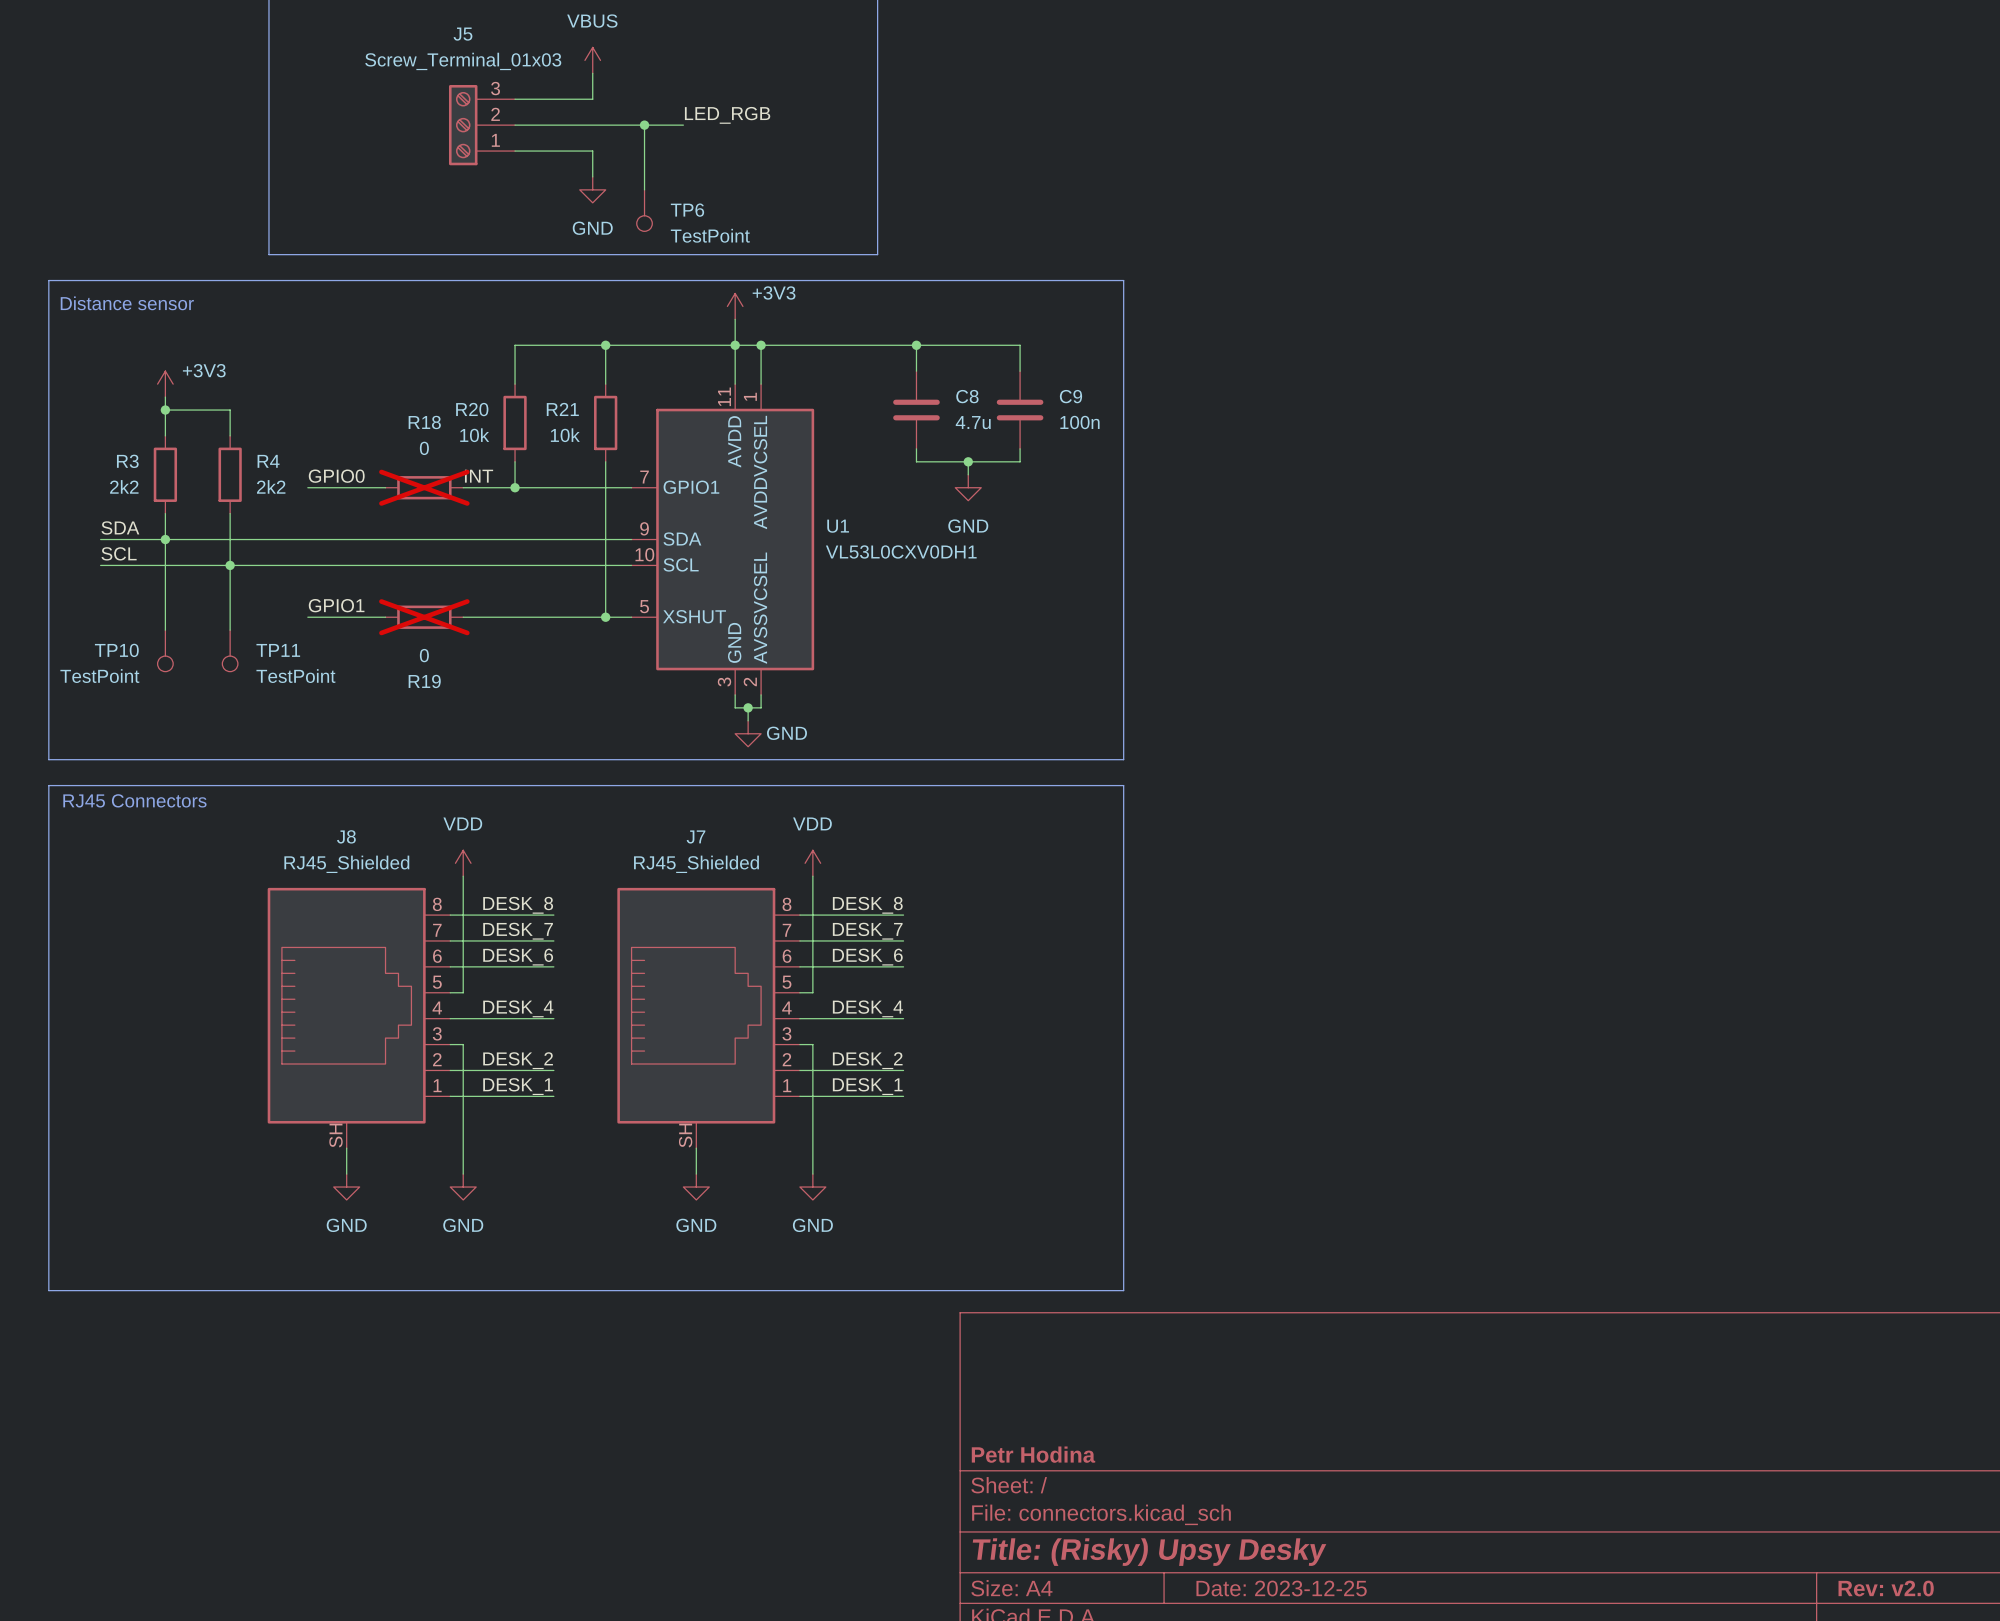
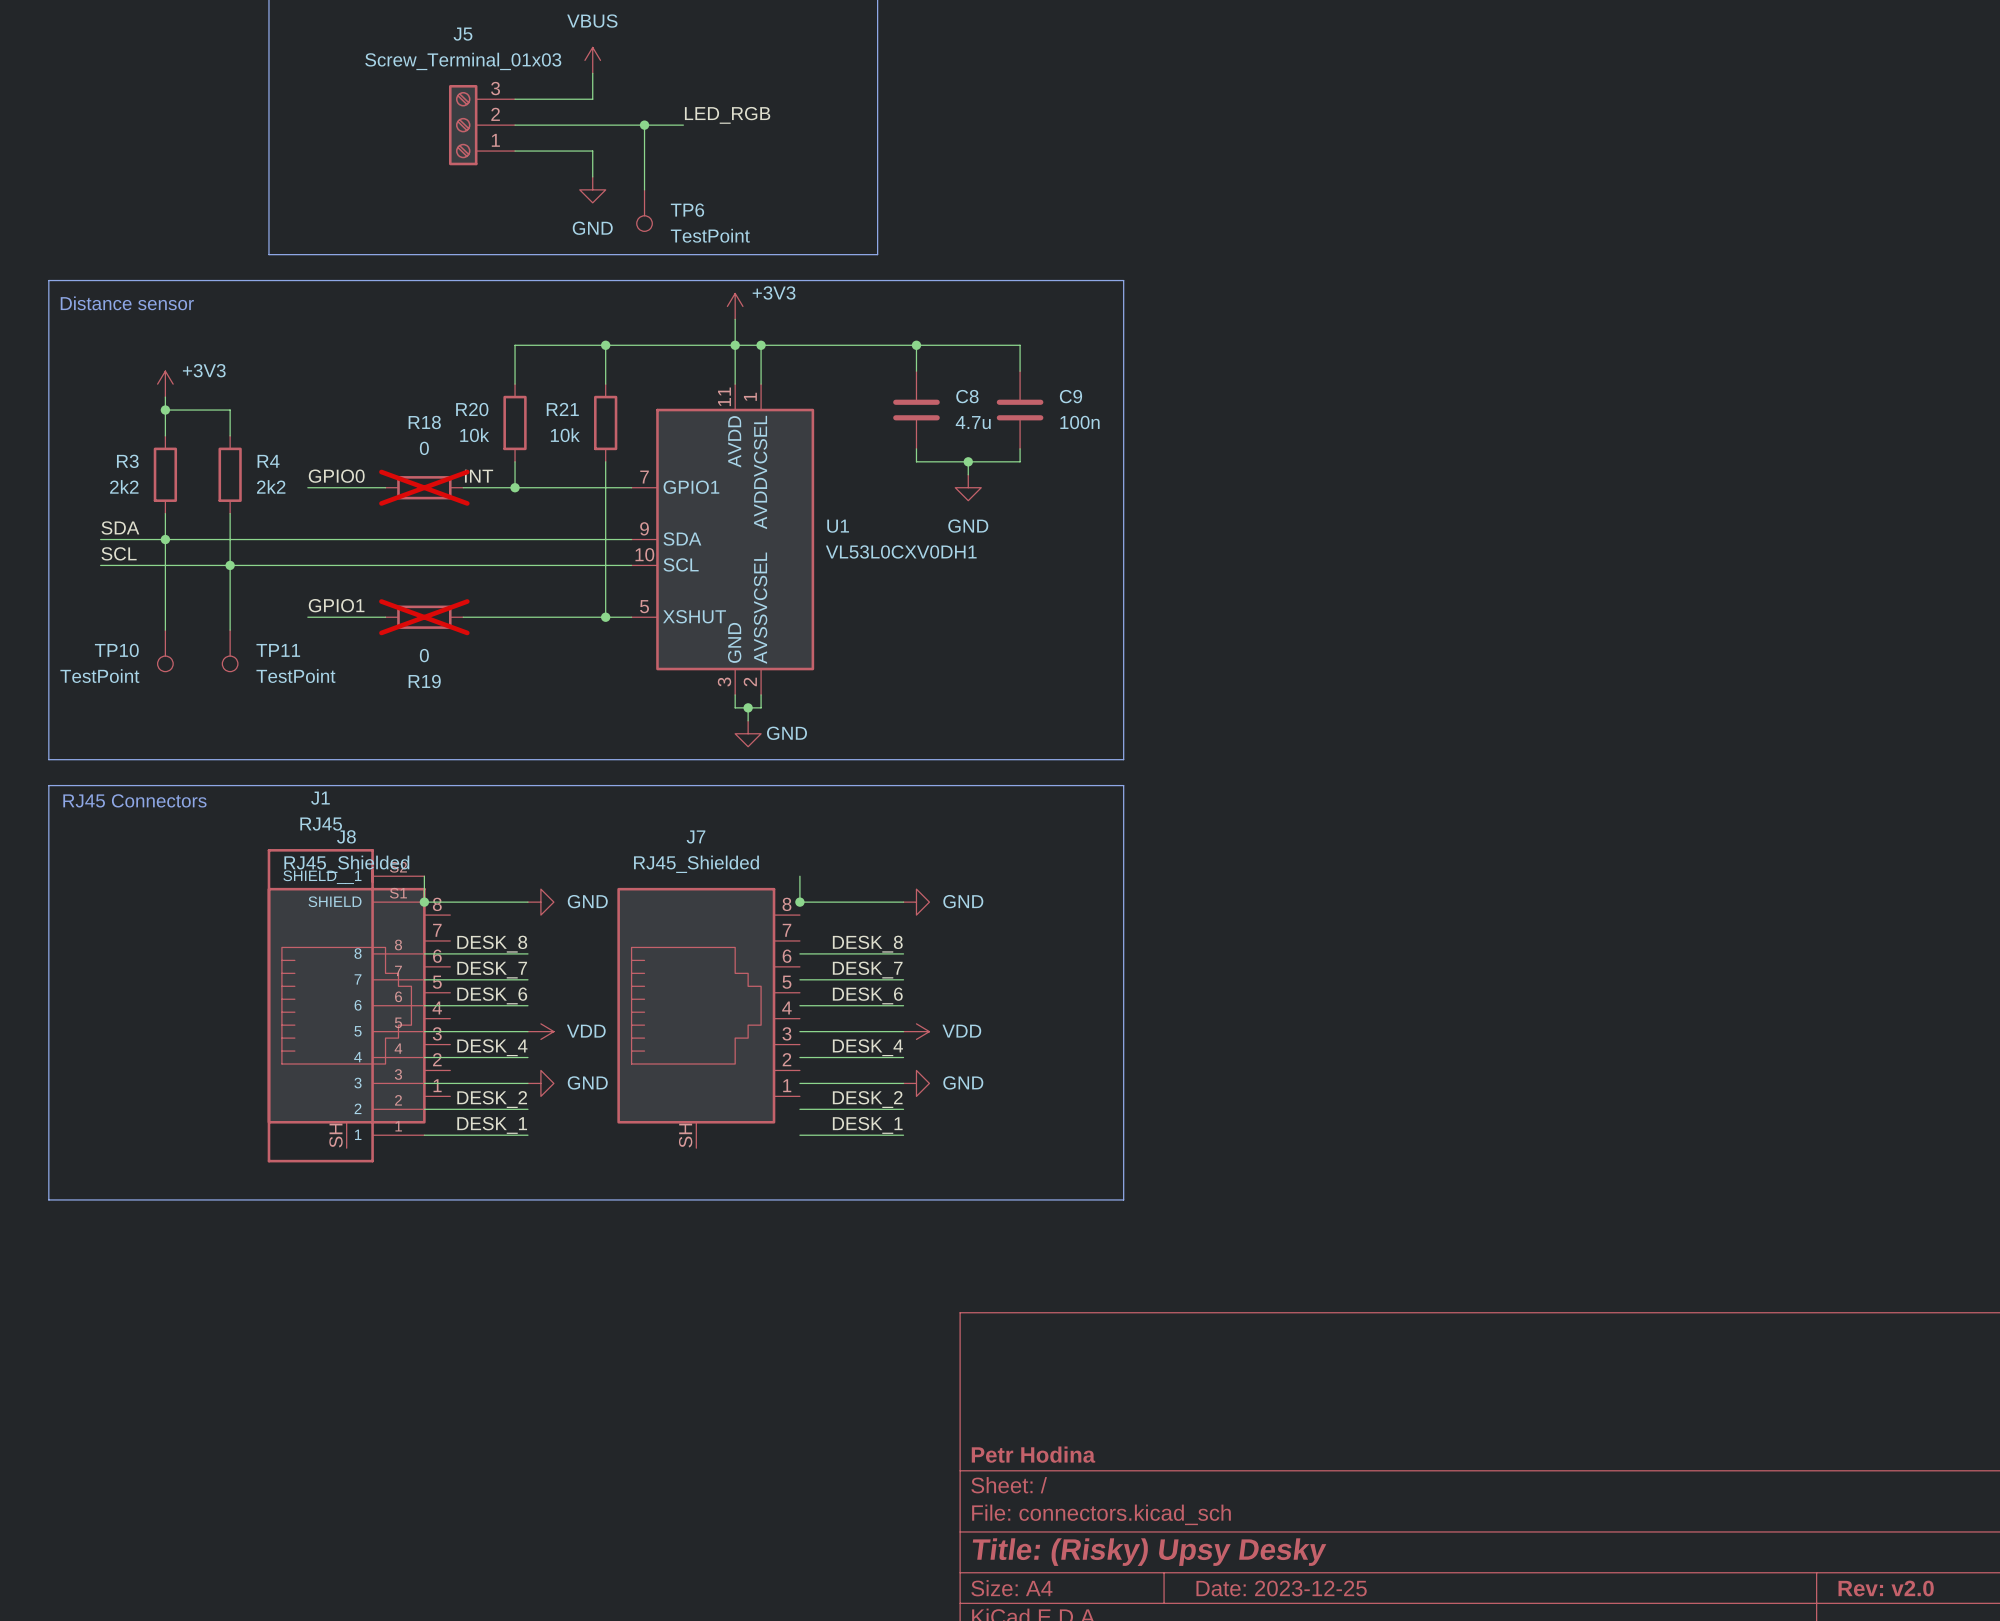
power symbol: VDD (463, 863) -> none
power symbol: VDD (812, 863) -> none
wire: none -> (424, 876) (424, 902) (527, 902)
wire: (463, 876) (463, 992) (450, 992) -> none
wire: none -> (799, 876) (799, 902) (903, 902)
wire: (812, 876) (812, 992) (799, 992) -> none
junction: none -> (424, 902)
power symbol: none -> GND (540, 902)
junction: none -> (799, 902)
power symbol: none -> GND (916, 902)
label position: DESK_8 (518, 905) -> DESK_8 (492, 944)
label position: DESK_8 (867, 905) -> DESK_8 (867, 944)
wire: (450, 915) (553, 915) -> (424, 953) (527, 953)
wire: (799, 915) (903, 915) -> (799, 953) (903, 953)
label position: DESK_7 (518, 931) -> DESK_7 (492, 970)
label position: DESK_7 (867, 931) -> DESK_7 (867, 970)
wire: (450, 940) (553, 940) -> (424, 979) (527, 979)
wire: (799, 940) (903, 940) -> (799, 979) (903, 979)
label position: DESK_6 (518, 957) -> DESK_6 (492, 995)
label position: DESK_6 (867, 957) -> DESK_6 (867, 995)
wire: (450, 966) (553, 966) -> (424, 1005) (527, 1005)
wire: (799, 966) (903, 966) -> (799, 1005) (903, 1005)
J1: none -> RJ45 (346, 1005)
label position: DESK_4 (518, 1008) -> DESK_4 (492, 1047)
label position: DESK_4 (867, 1008) -> DESK_4 (867, 1047)
wire: (450, 1018) (553, 1018) -> (424, 1057) (527, 1057)
wire: (799, 1018) (903, 1018) -> (799, 1057) (903, 1057)
wire: none -> (424, 1031) (527, 1031)
power symbol: none -> VDD (540, 1031)
wire: none -> (799, 1031) (903, 1031)
power symbol: none -> VDD (916, 1031)
wire: (450, 1044) (463, 1044) (463, 1174) -> none
wire: (799, 1044) (812, 1044) (812, 1174) -> none
label position: DESK_2 (518, 1060) -> DESK_2 (492, 1099)
label position: DESK_2 (867, 1060) -> DESK_2 (867, 1099)
wire: (450, 1070) (553, 1070) -> (424, 1109) (527, 1109)
wire: (799, 1070) (903, 1070) -> (799, 1109) (903, 1109)
wire: none -> (424, 1083) (527, 1083)
power symbol: none -> GND (540, 1083)
wire: none -> (799, 1083) (903, 1083)
power symbol: none -> GND (916, 1083)
label position: DESK_1 (518, 1086) -> DESK_1 (492, 1125)
label position: DESK_1 (867, 1086) -> DESK_1 (867, 1125)
wire: (450, 1096) (553, 1096) -> (424, 1135) (527, 1135)
wire: (799, 1096) (903, 1096) -> (799, 1135) (903, 1135)
wire: (346, 1148) (346, 1174) -> none
wire: (696, 1148) (696, 1174) -> none
power symbol: GND (346, 1187) -> none
power symbol: GND (463, 1187) -> none
power symbol: GND (696, 1187) -> none
power symbol: GND (812, 1187) -> none
line: (48, 1199) (48, 1290) (1123, 1290) (1123, 1199) -> (48, 1199) (1123, 1199)

